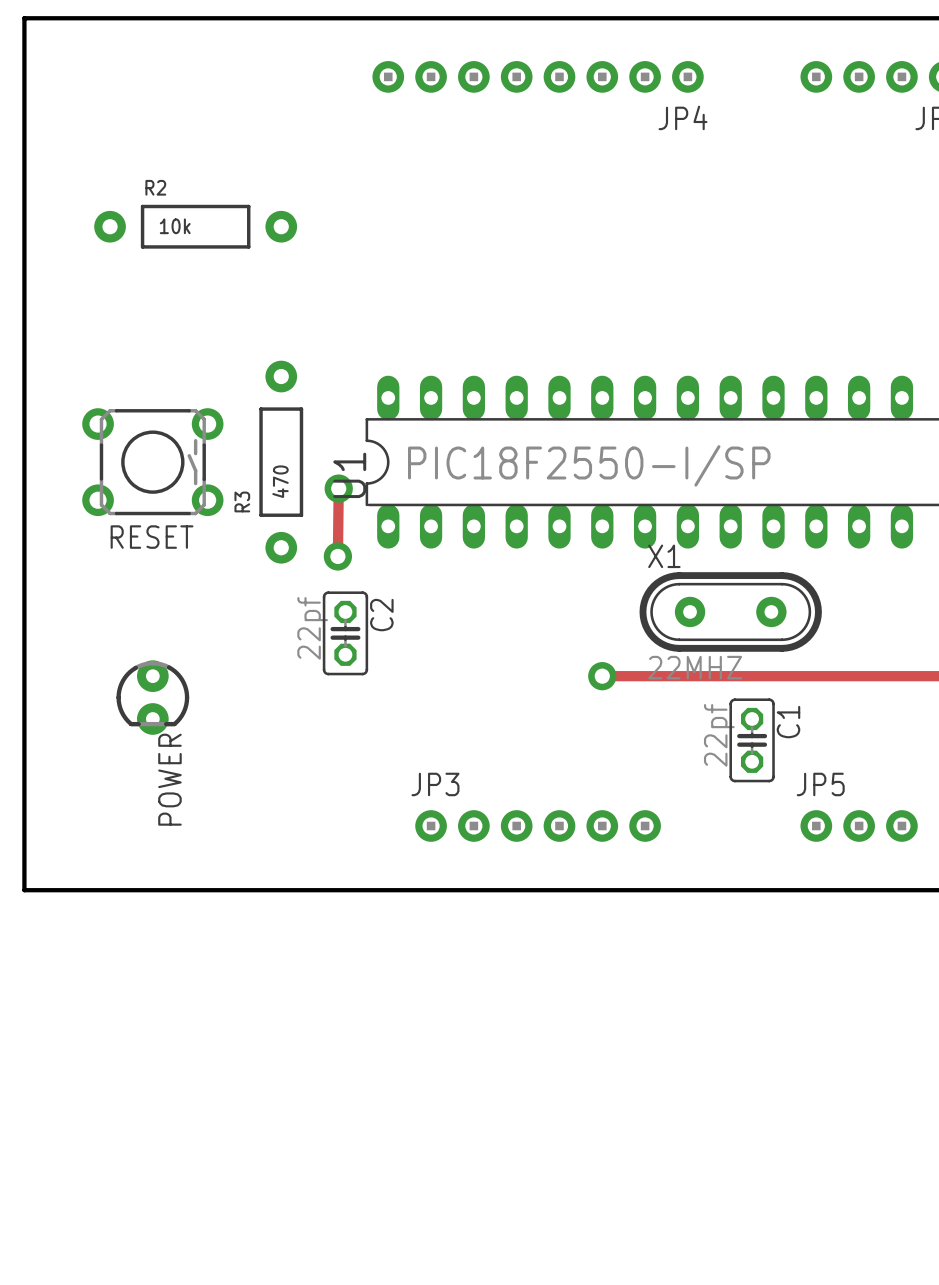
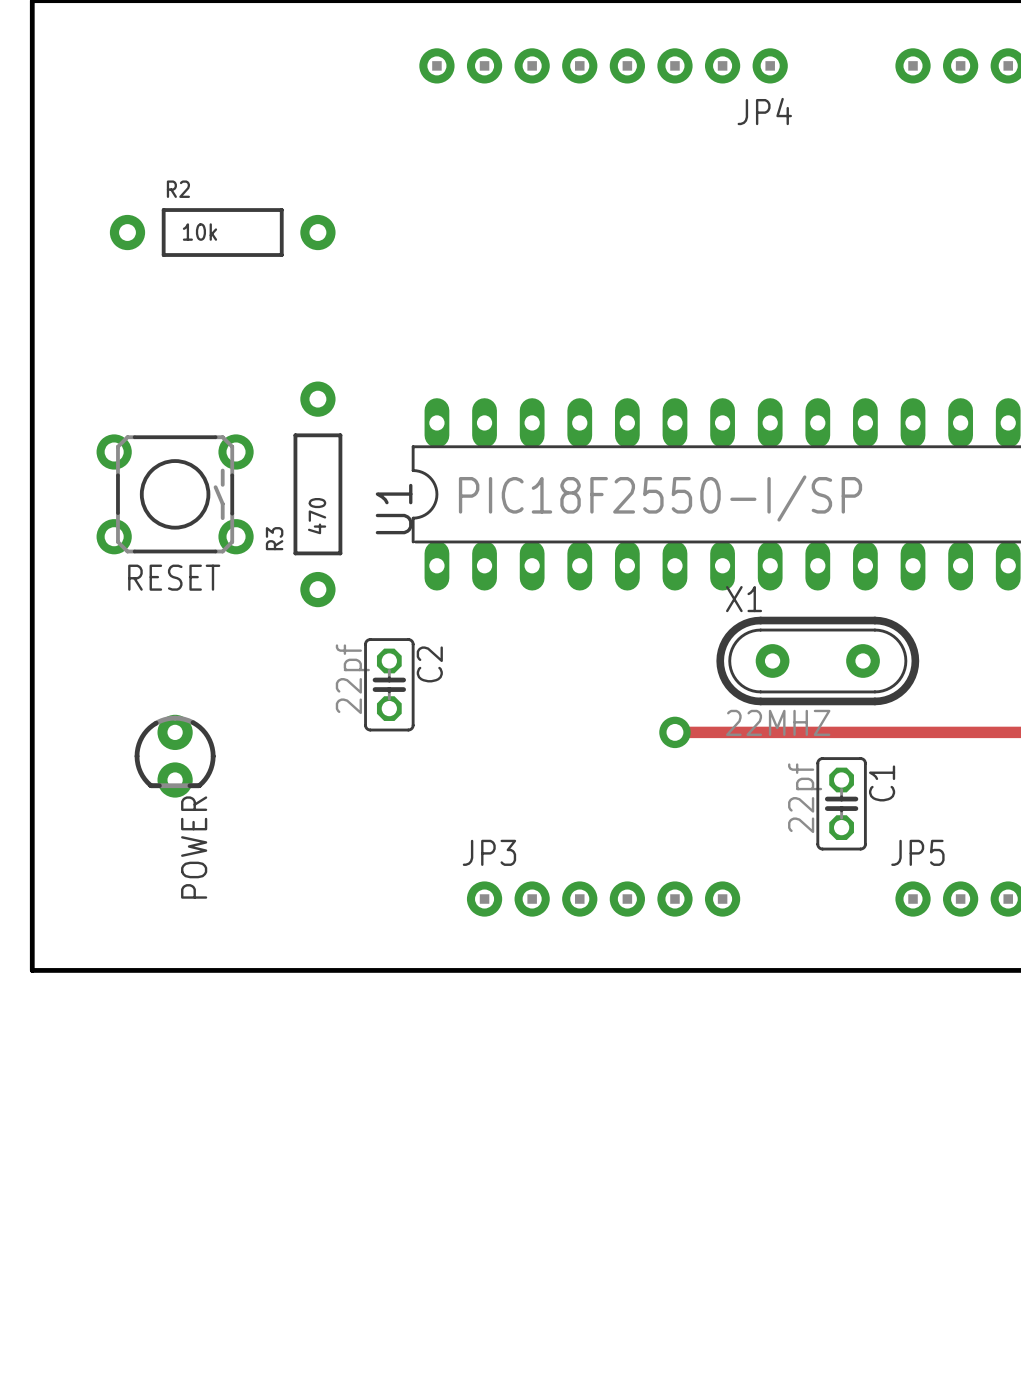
track: (338, 488) (337, 556) -> none
via: (338, 488) -> none
via: (337, 556) -> none

